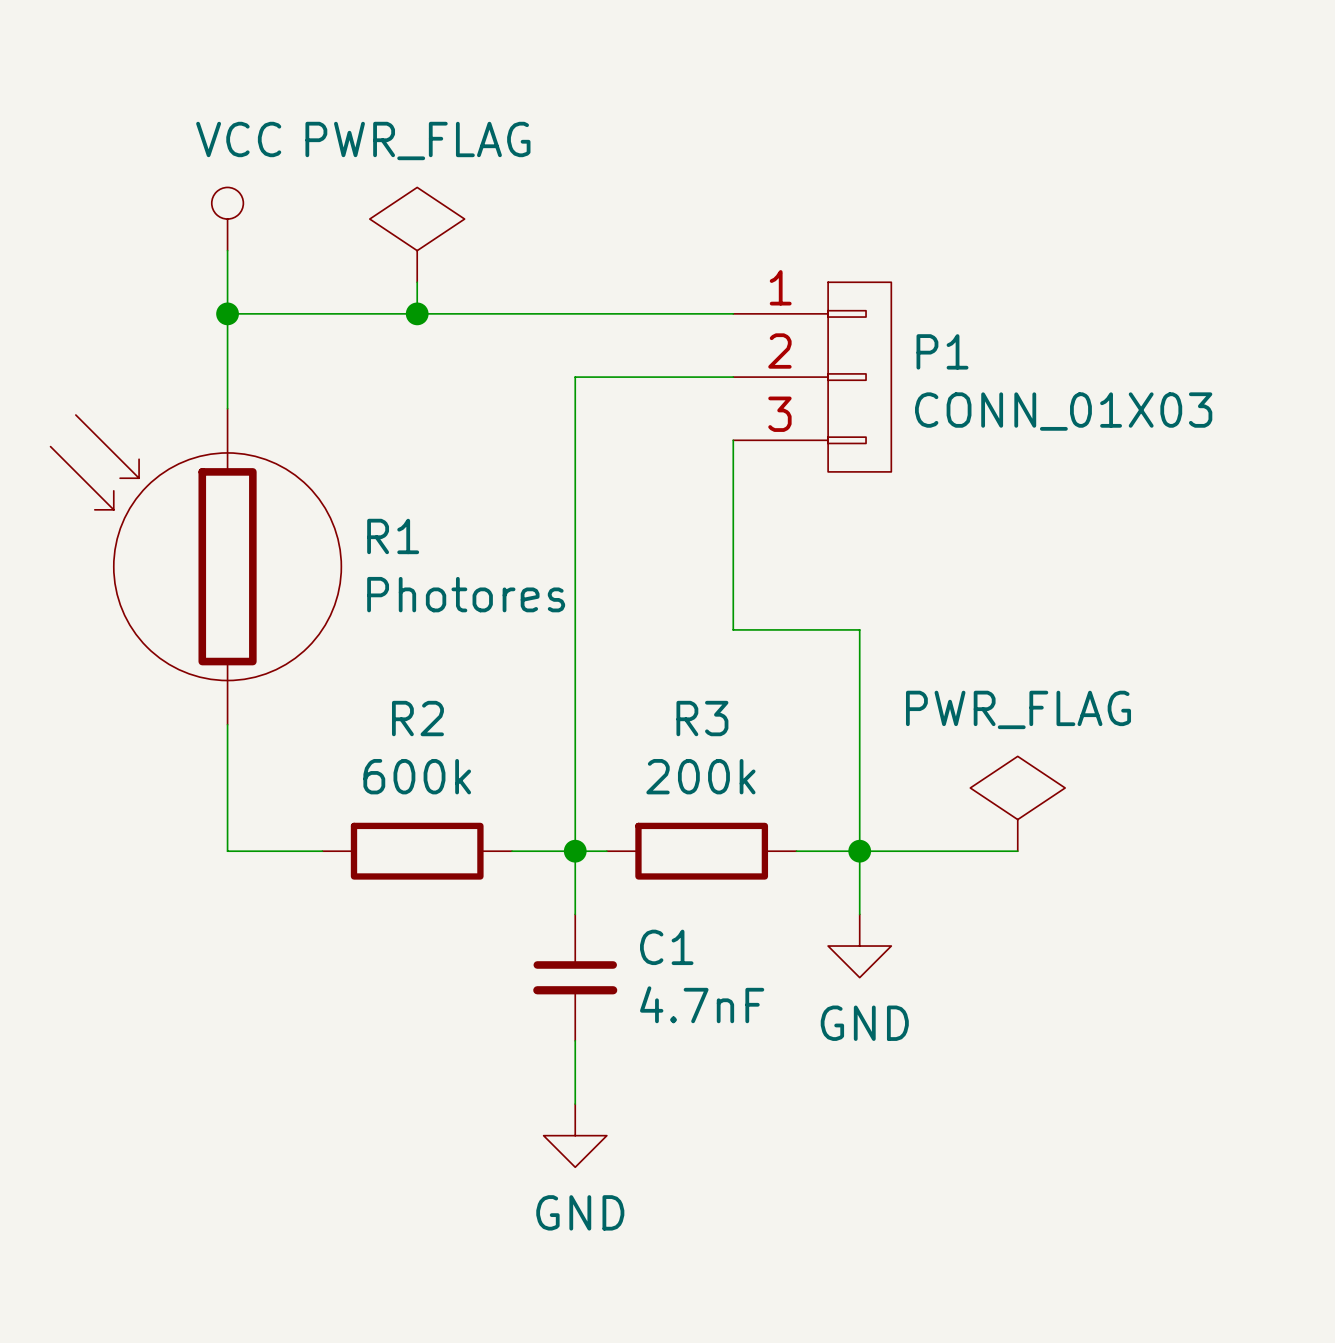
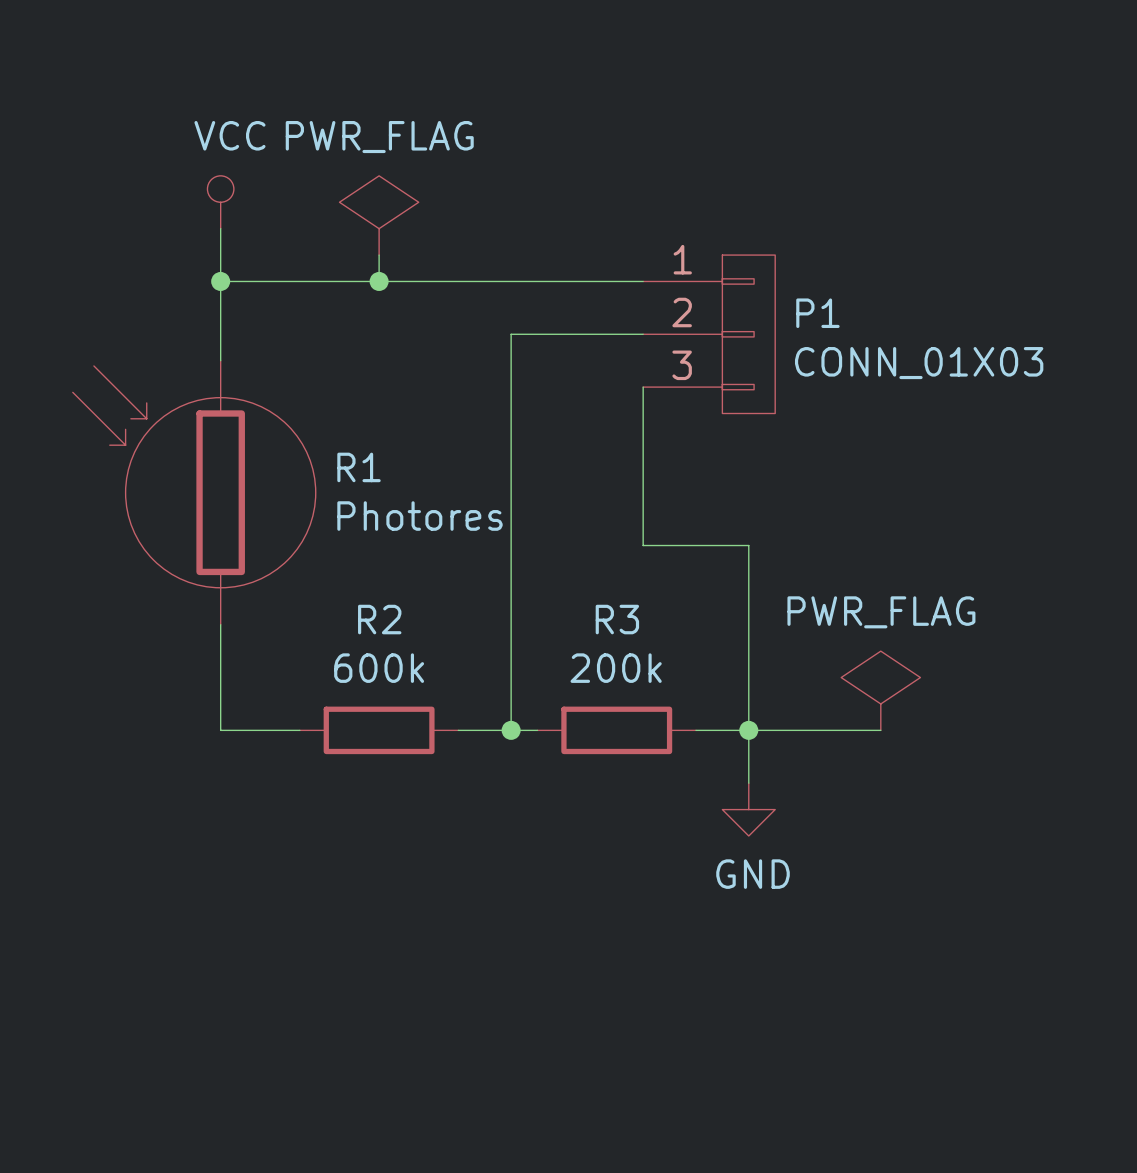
wire: (575, 851) (575, 914) -> none
C1: 4.7nF (575, 977) -> none
wire: (575, 1040) (575, 1104) -> none
power symbol: GND (575, 1135) -> none

